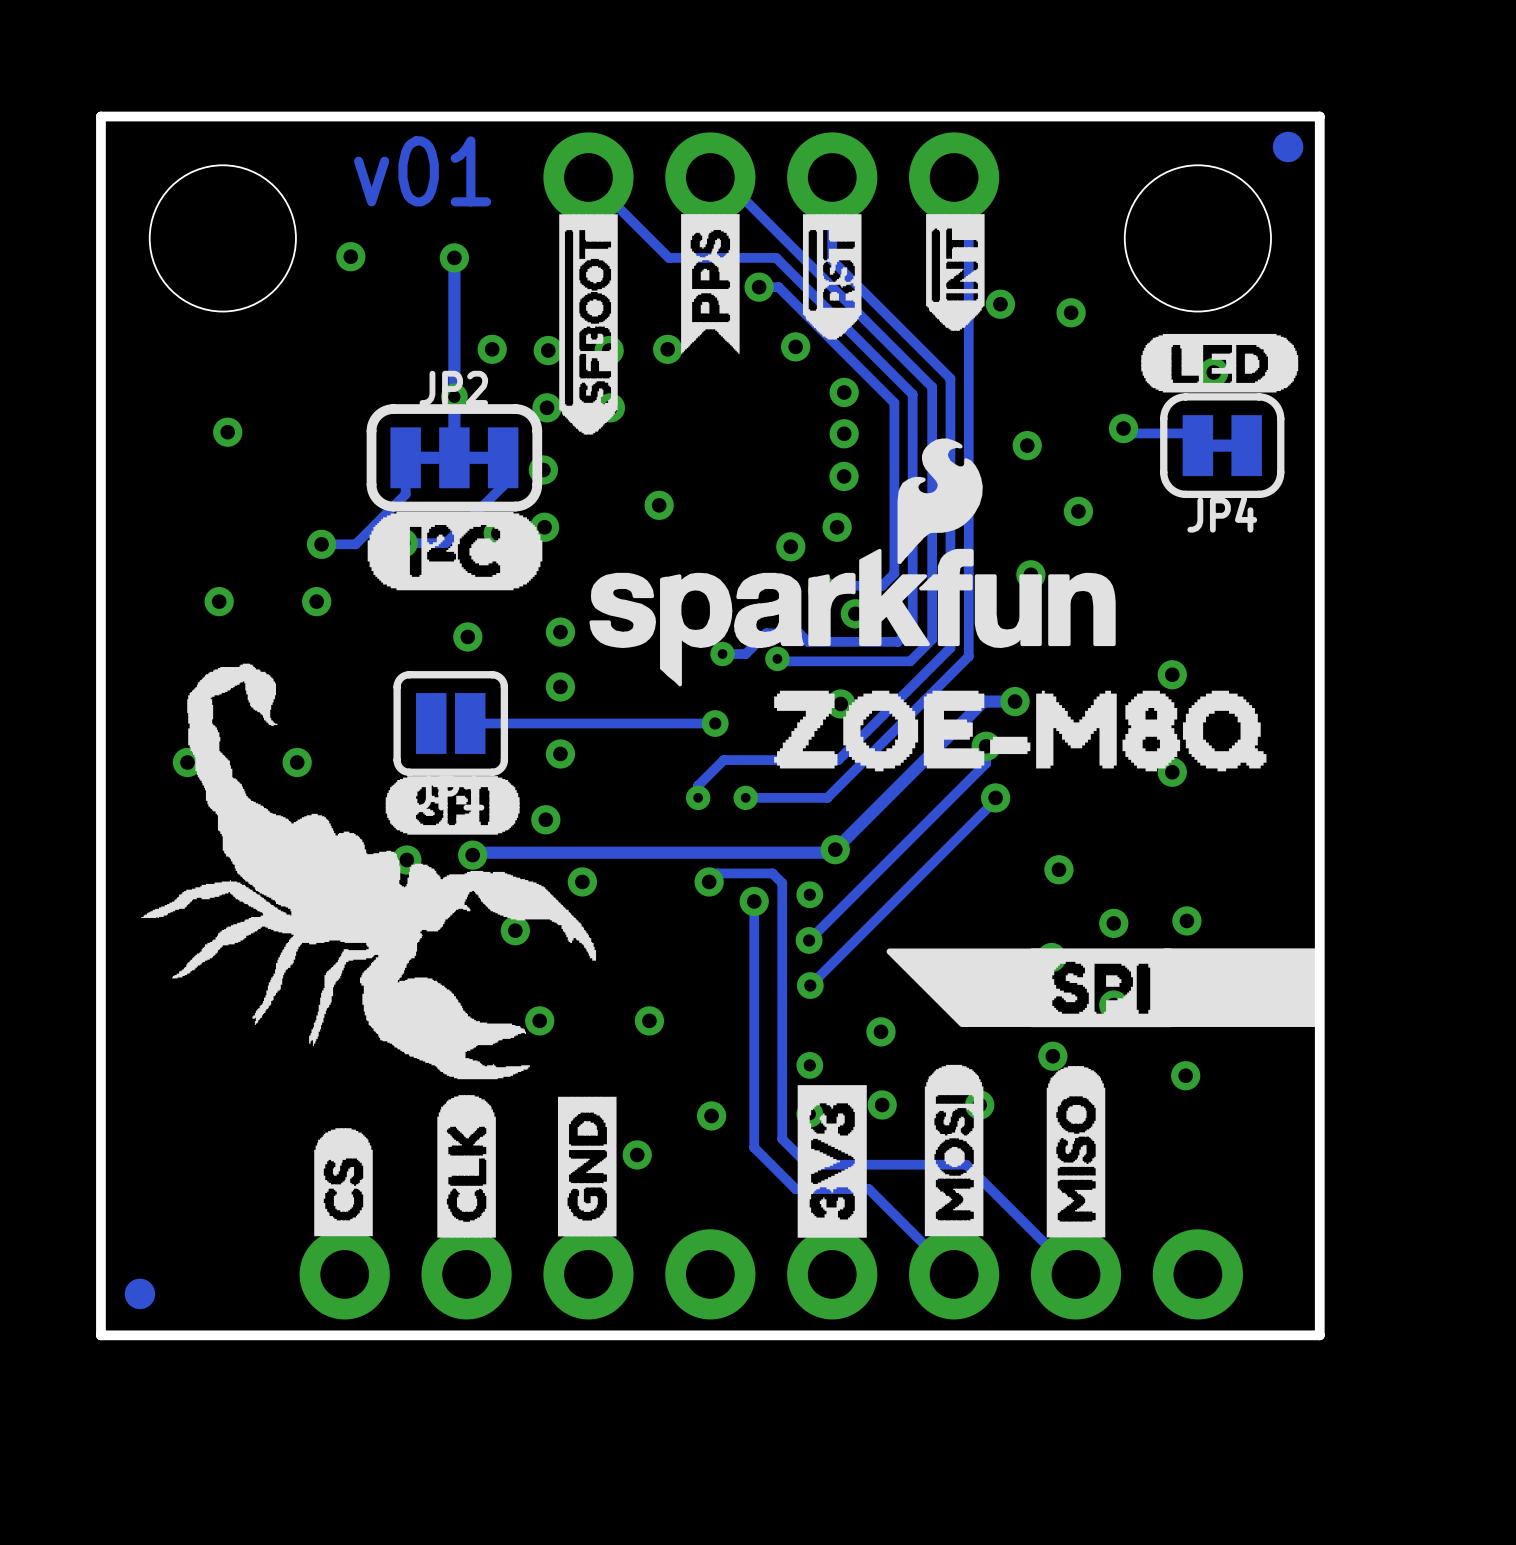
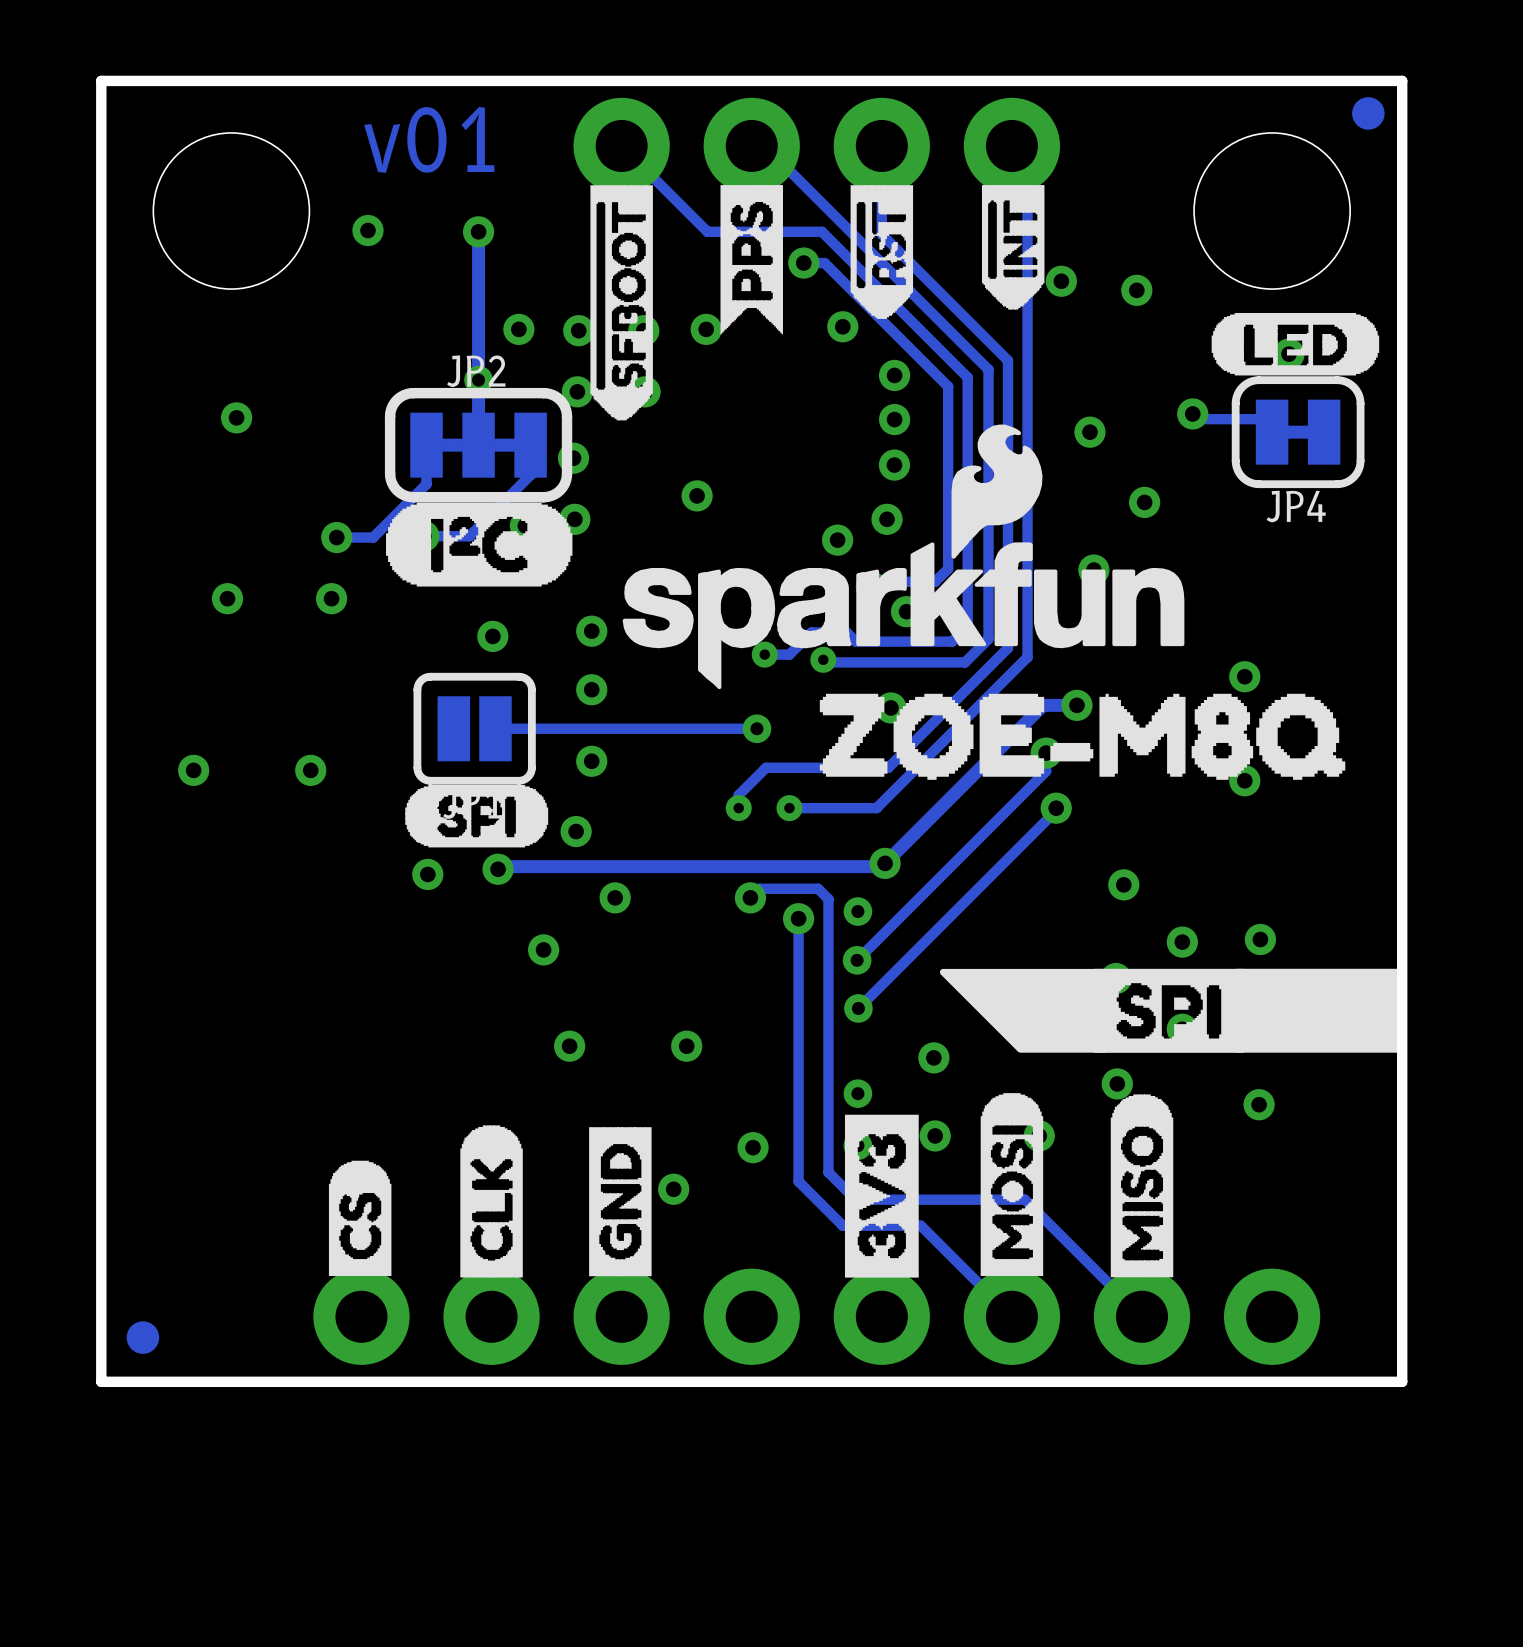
drawing: [141, 663, 597, 1080] -> none

